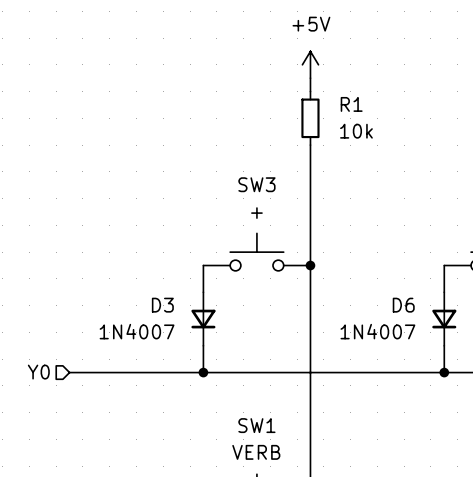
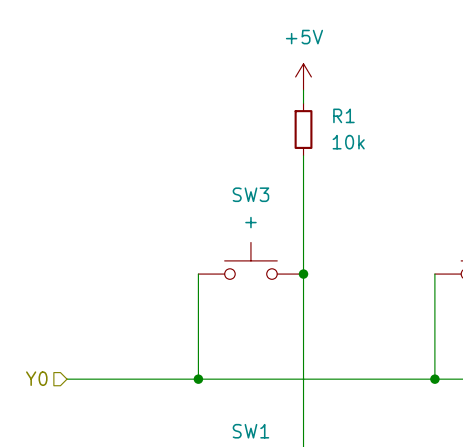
D3: 1N4007 (203, 319) -> none
D6: 1N4007 (444, 319) -> none

